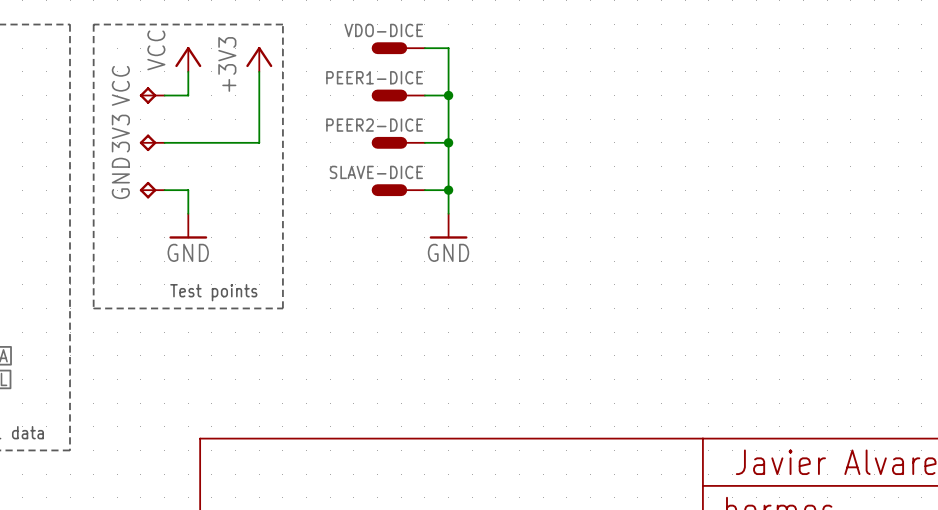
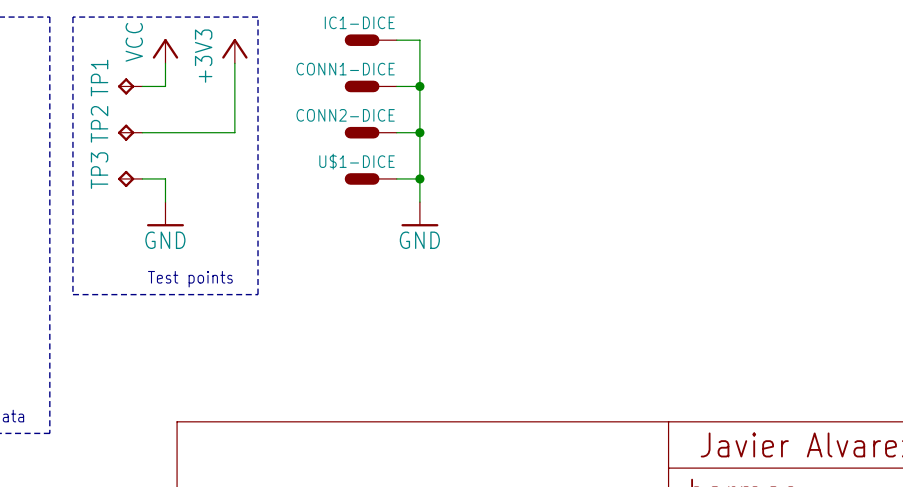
VDO-DICE name: VDO-DICE (383, 30) -> IC1-DICE (359, 22)
PEER1-DICE name: PEER1-DICE (374, 77) -> CONN1-DICE (345, 69)
VCC name: VCC (120, 85) -> TP1 (99, 78)
PEER2-DICE name: PEER2-DICE (374, 125) -> CONN2-DICE (345, 115)
3V3 name: 3V3 (120, 133) -> TP2 (99, 124)
SLAVE-DICE name: SLAVE-DICE (376, 172) -> U$1-DICE (357, 161)
GND name: GND (120, 178) -> TP3 (99, 170)

